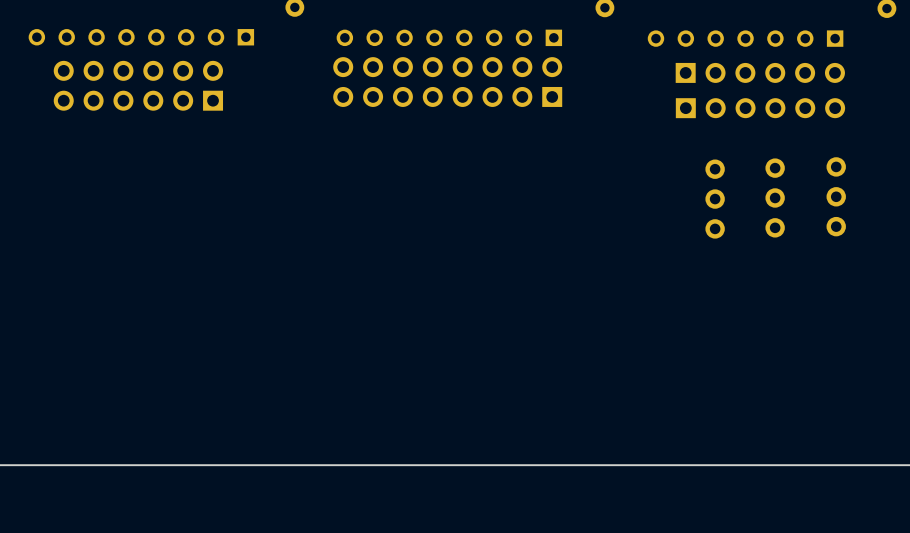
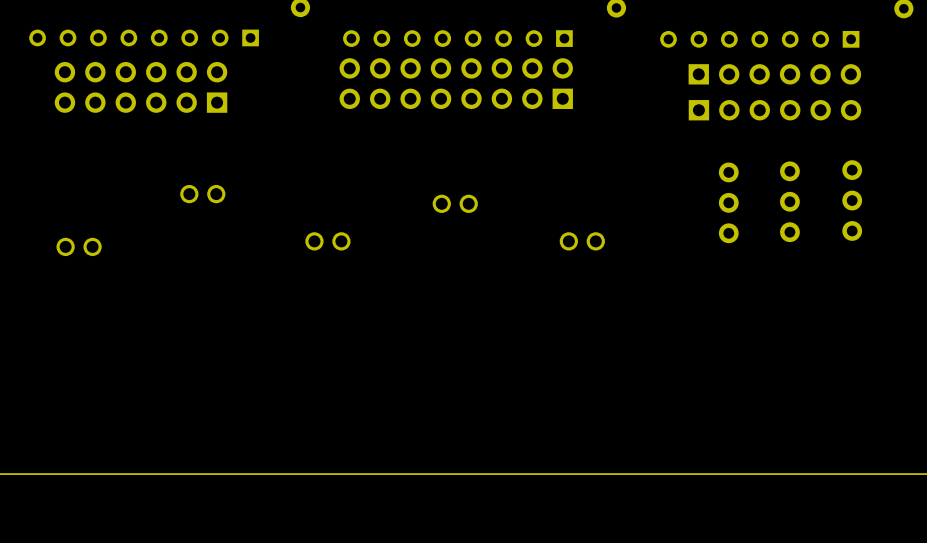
part: none -> (202, 194)
part: none -> (455, 203)
part: none -> (327, 241)
part: none -> (582, 241)
part: none -> (79, 246)

